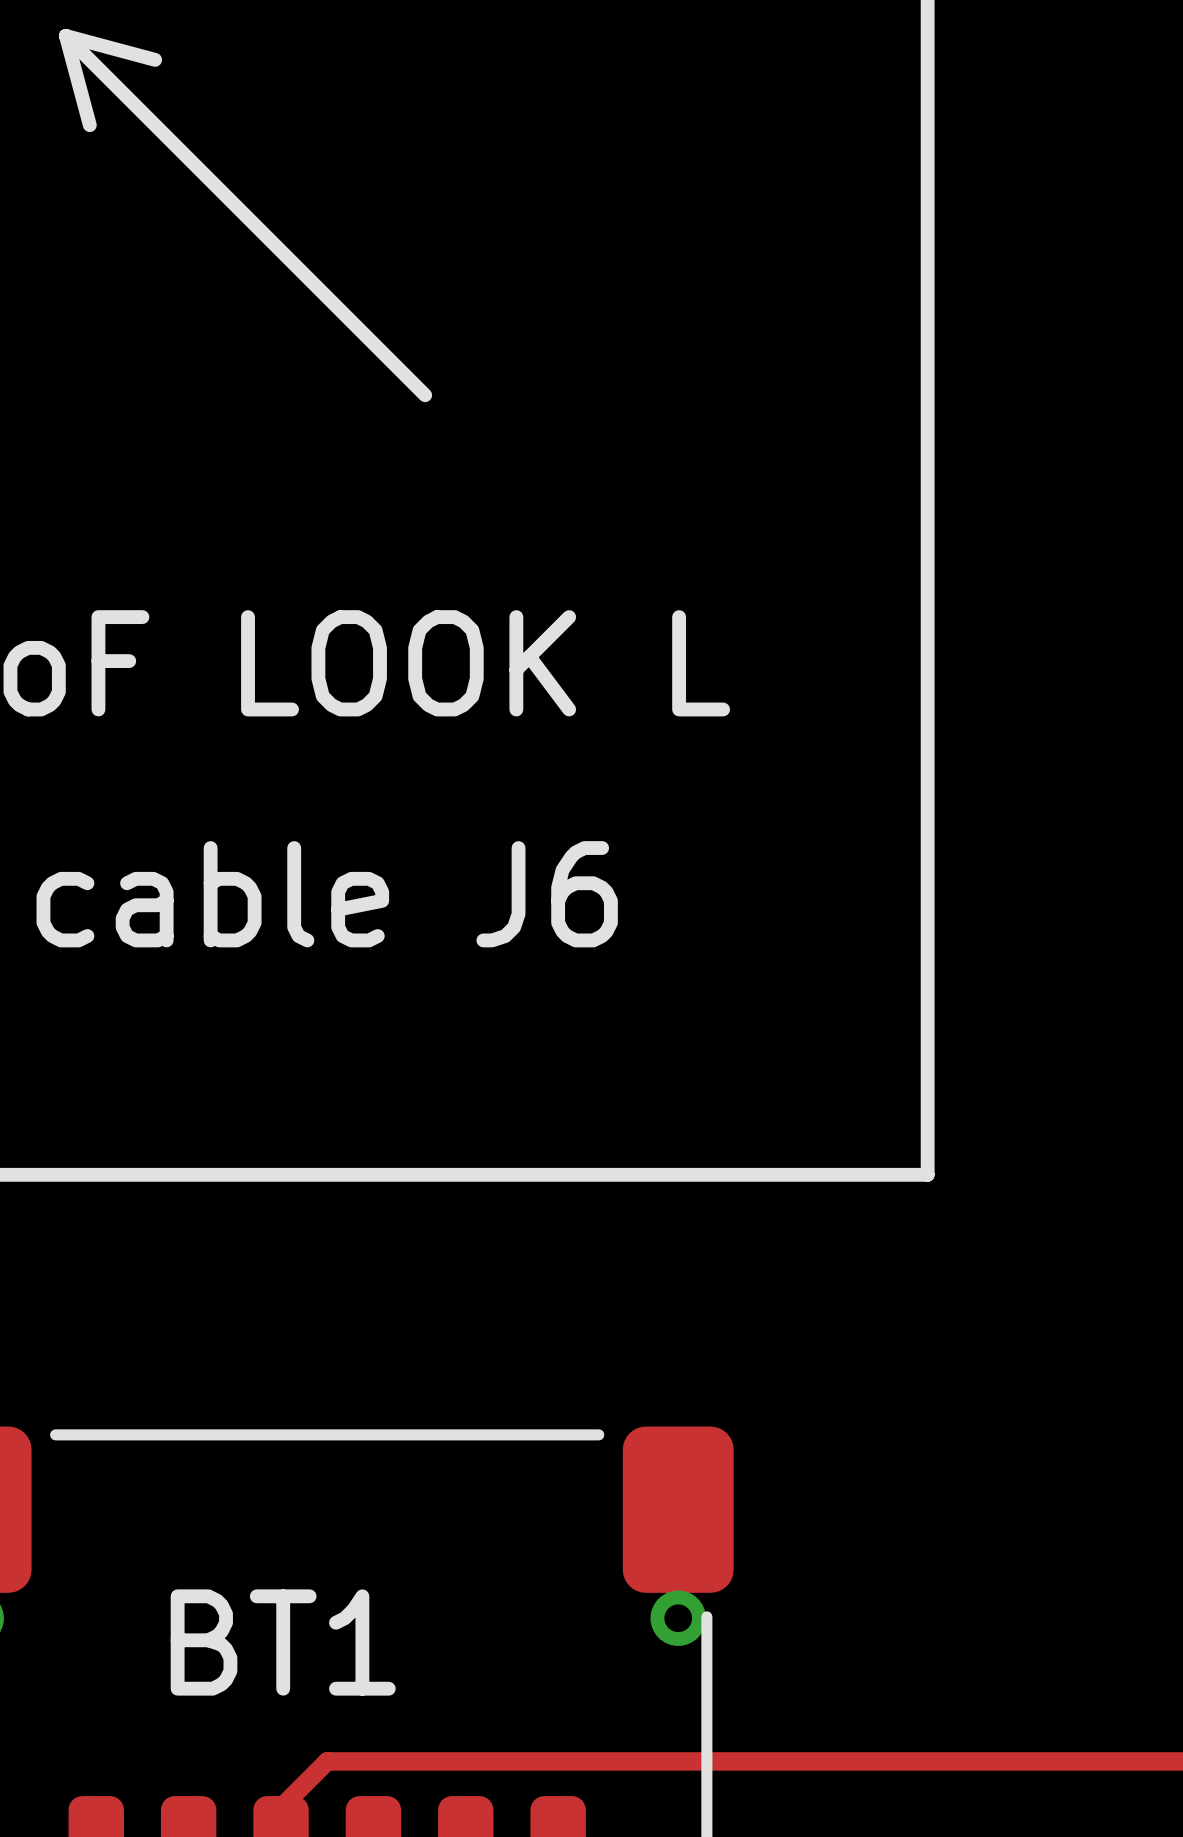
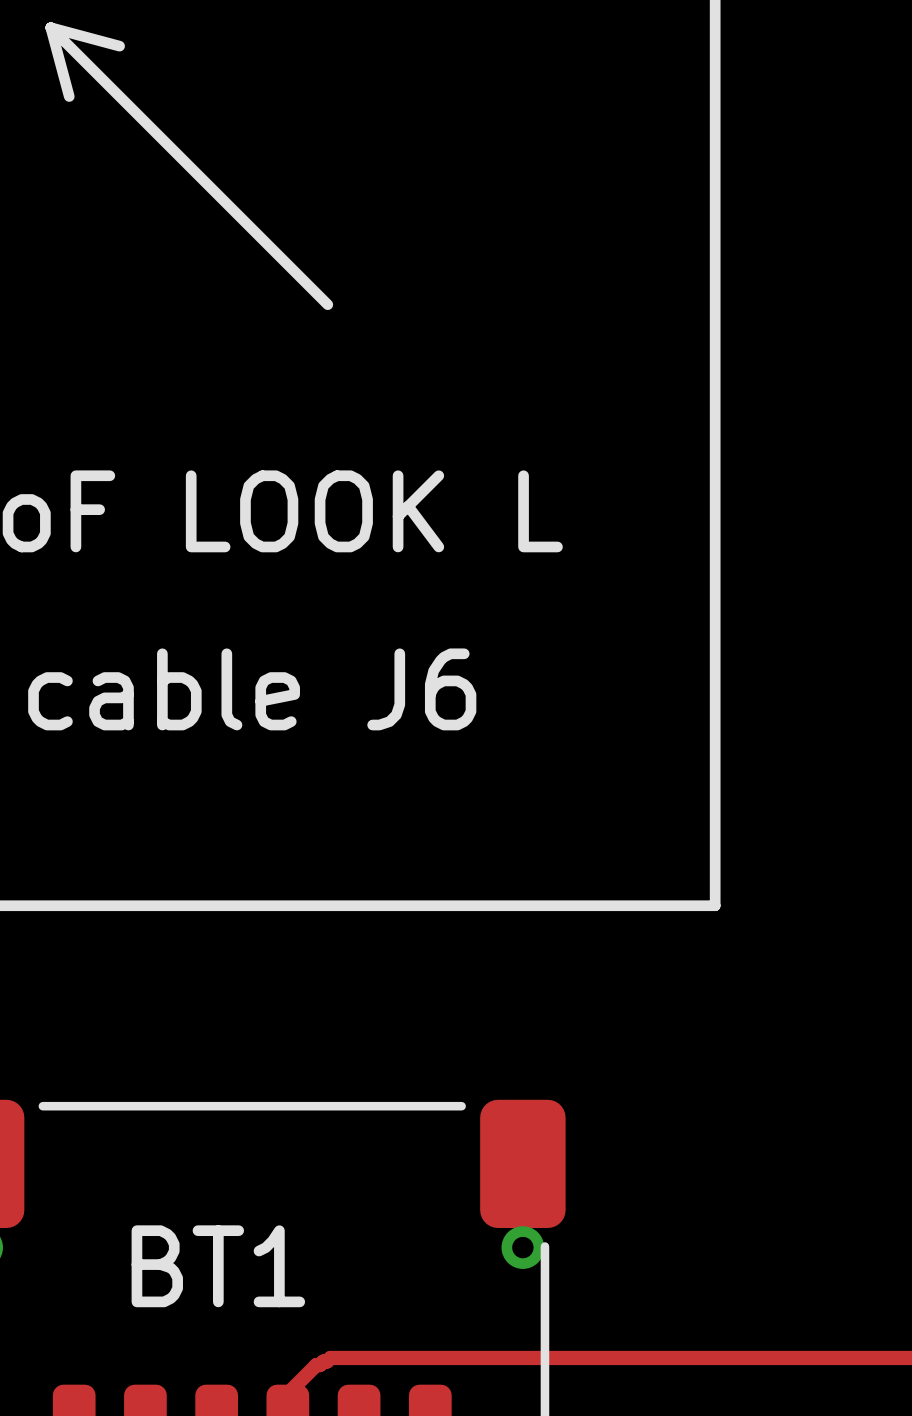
track: (428, 1761) (327, 1761) (281, 1807) (281, 1812) -> (330, 1357) (327, 1361) (316, 1365) (287, 1393) (287, 1397)

